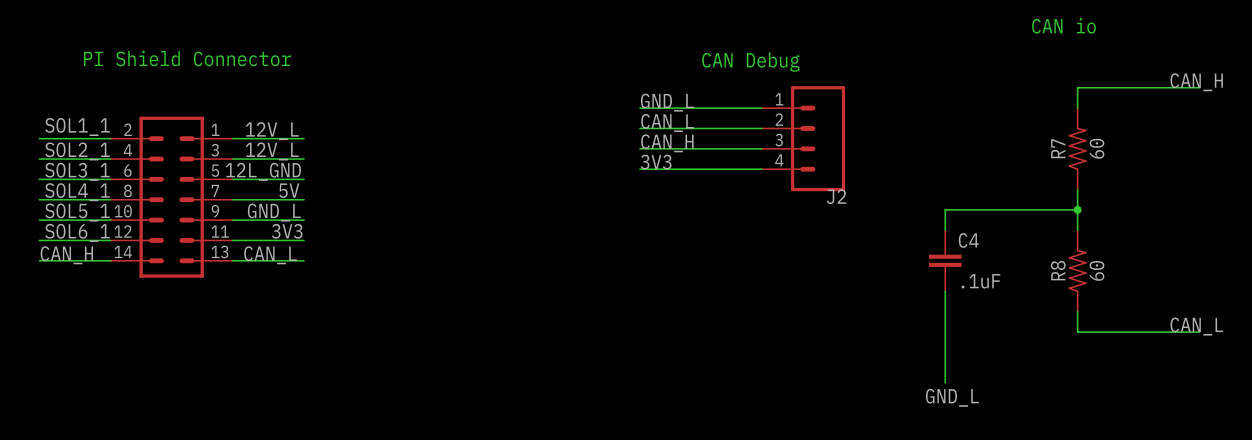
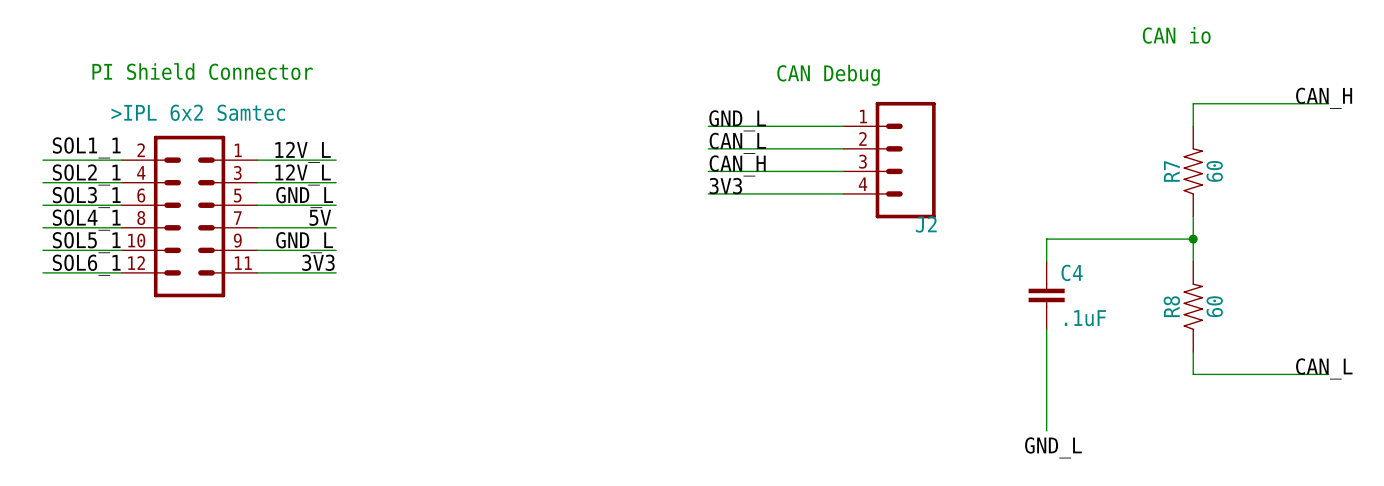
part symbol: [110, 116, 233, 278] -> [121, 135, 258, 298]
label: 12L_GND (263, 171) -> GND_L (304, 197)
label: CAN_H (66, 255) -> none
label: CAN_L (270, 255) -> none
wire: (39, 260) (110, 260) -> none
wire: (232, 260) (304, 260) -> none

